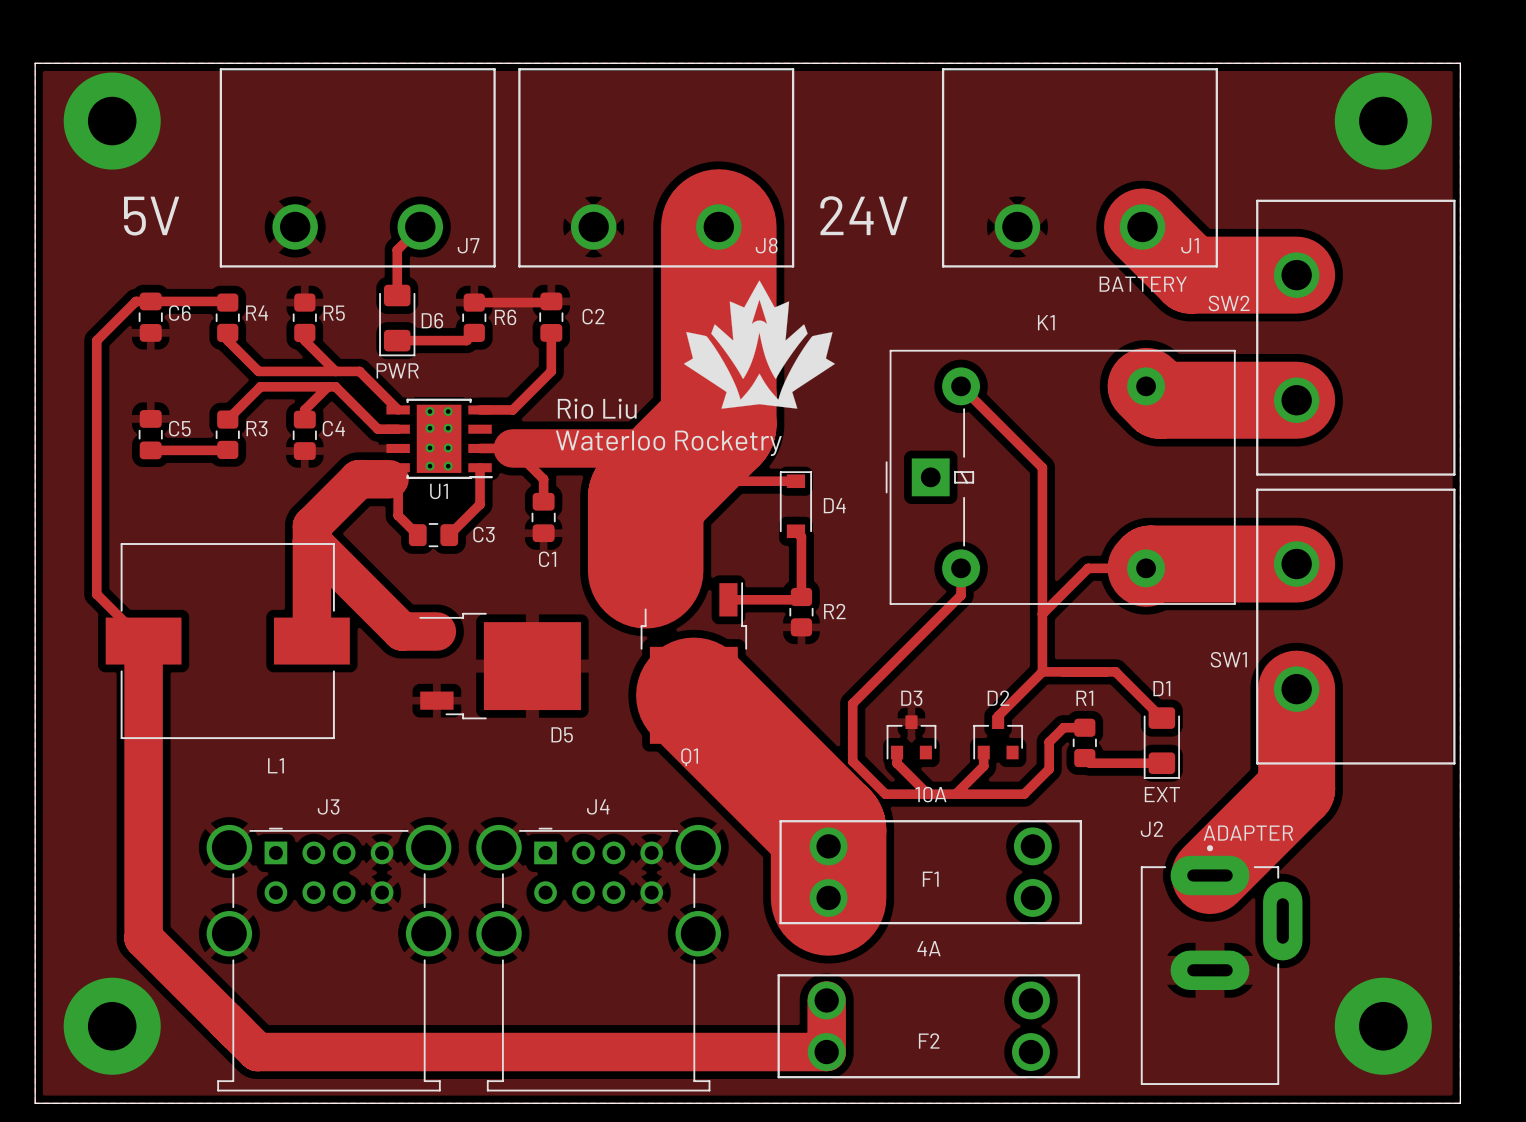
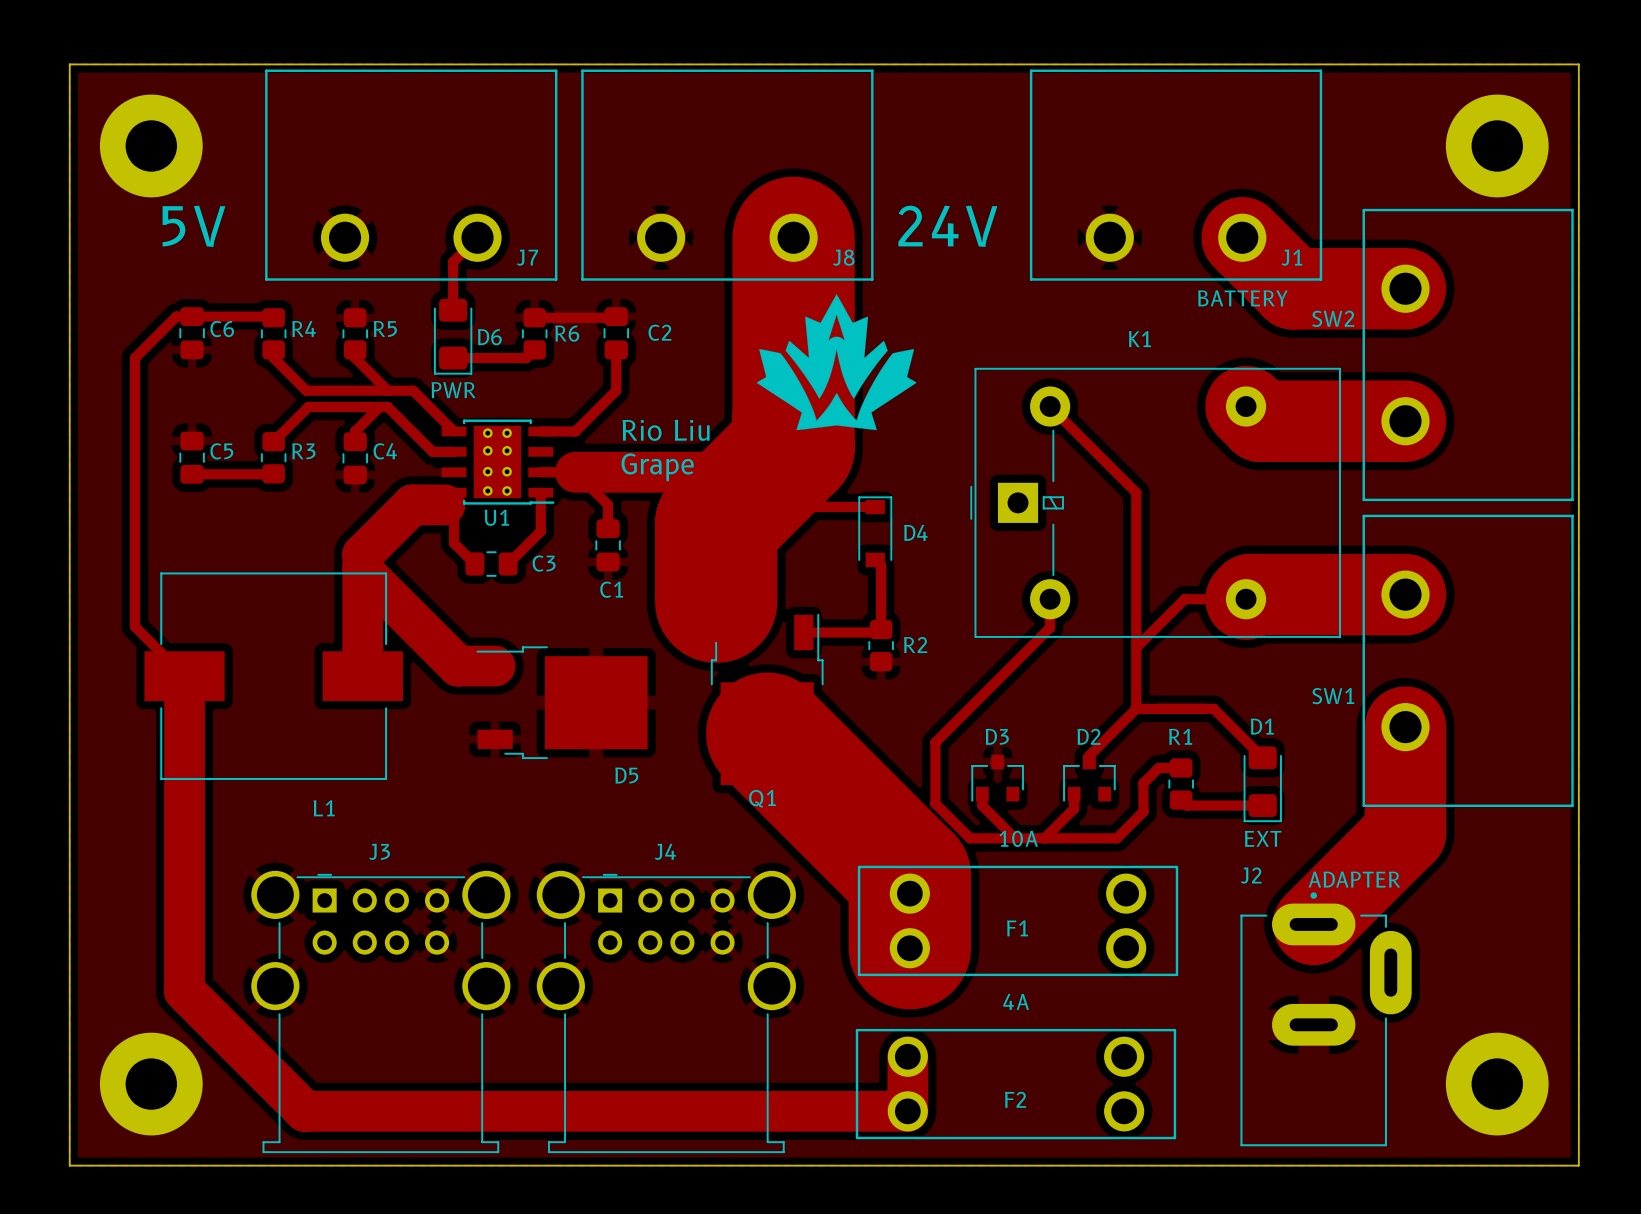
part position: (112, 121) -> (151, 145)
part position: (1383, 121) -> (1497, 145)
text: Waterloo Rocketry (668, 443) -> Grape (657, 467)

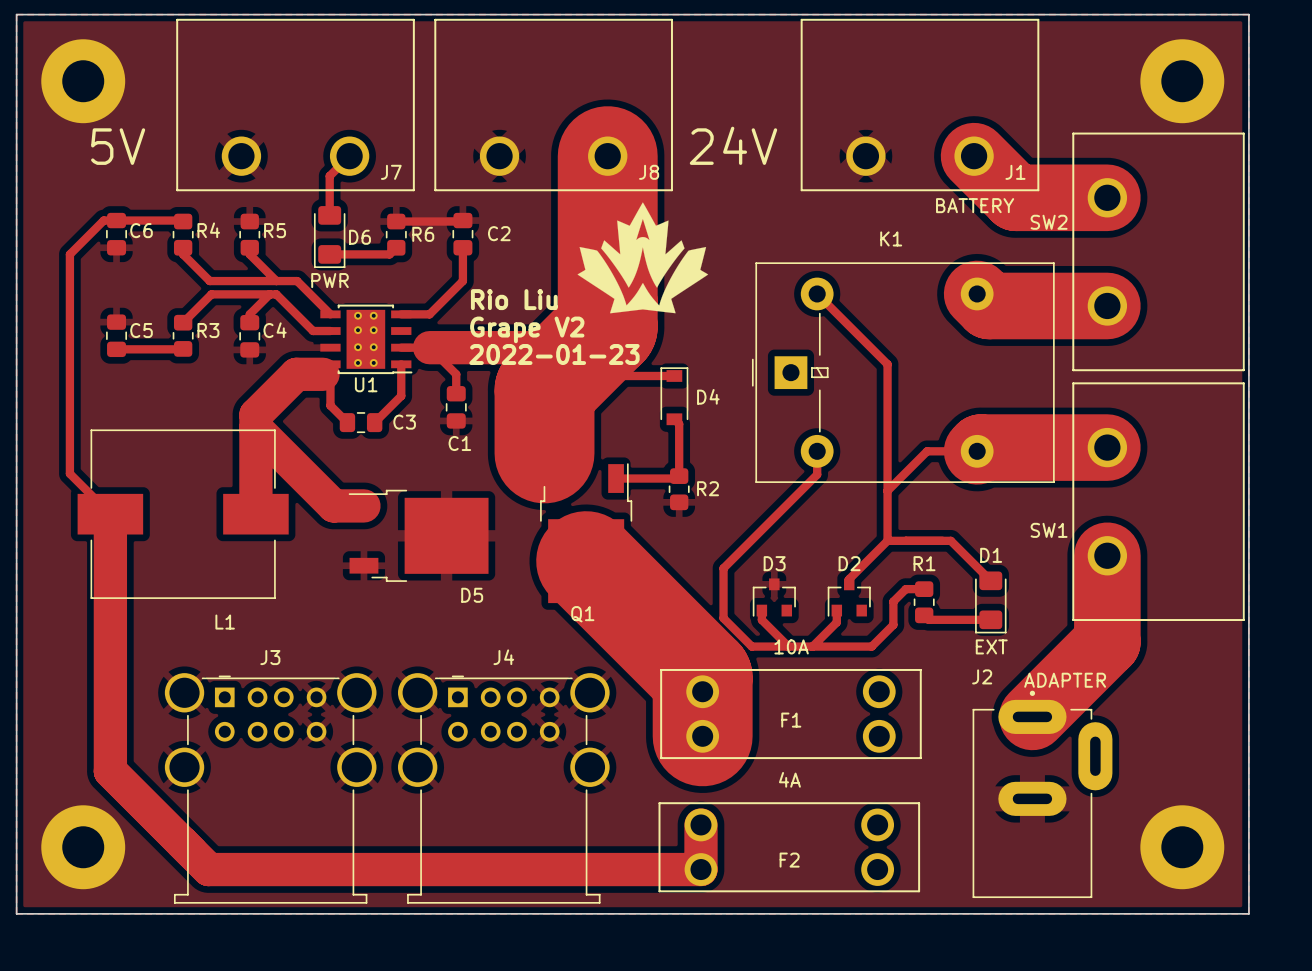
text position: Rio Liu (666, 430) -> Rio Liu (514, 299)
text: Grape (657, 467) -> Grape V2 (527, 329)
text: none -> 2022-01-23 (554, 354)

